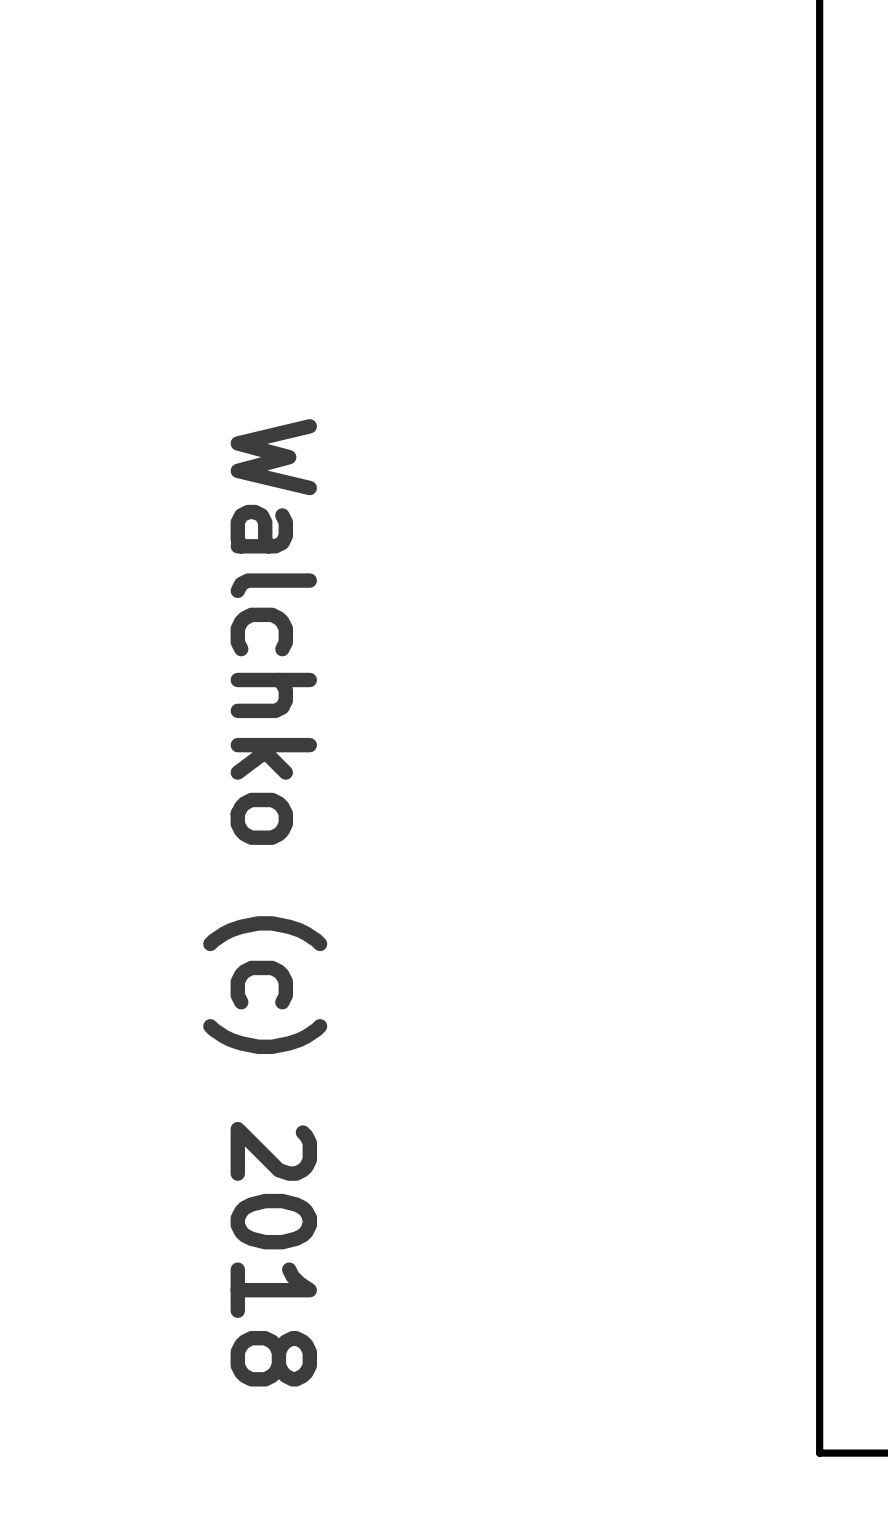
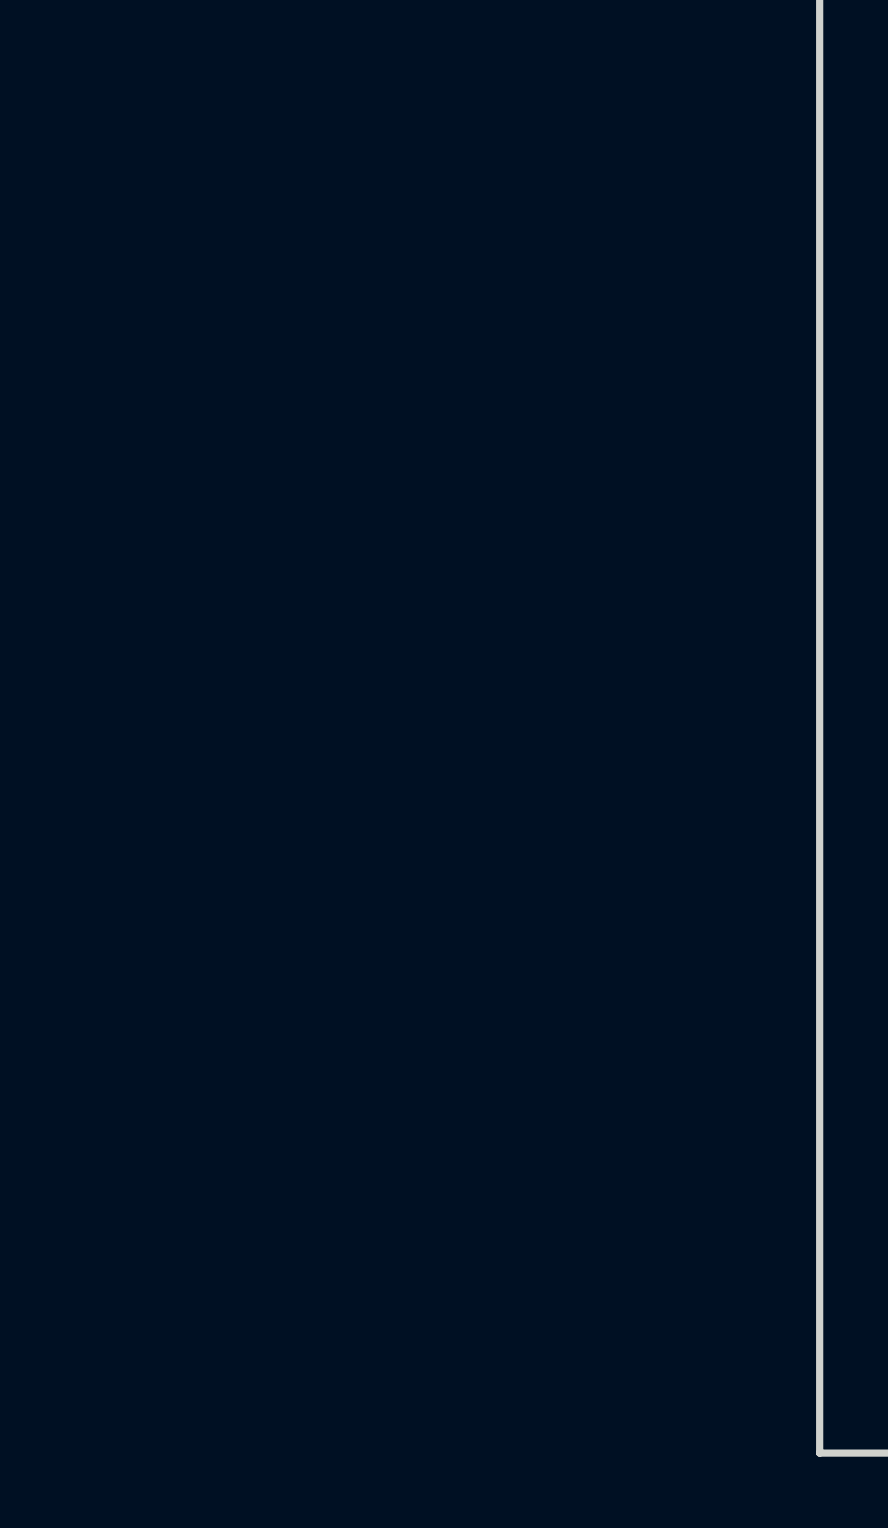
text: Walchko (c) 2018 (265, 902) -> none

